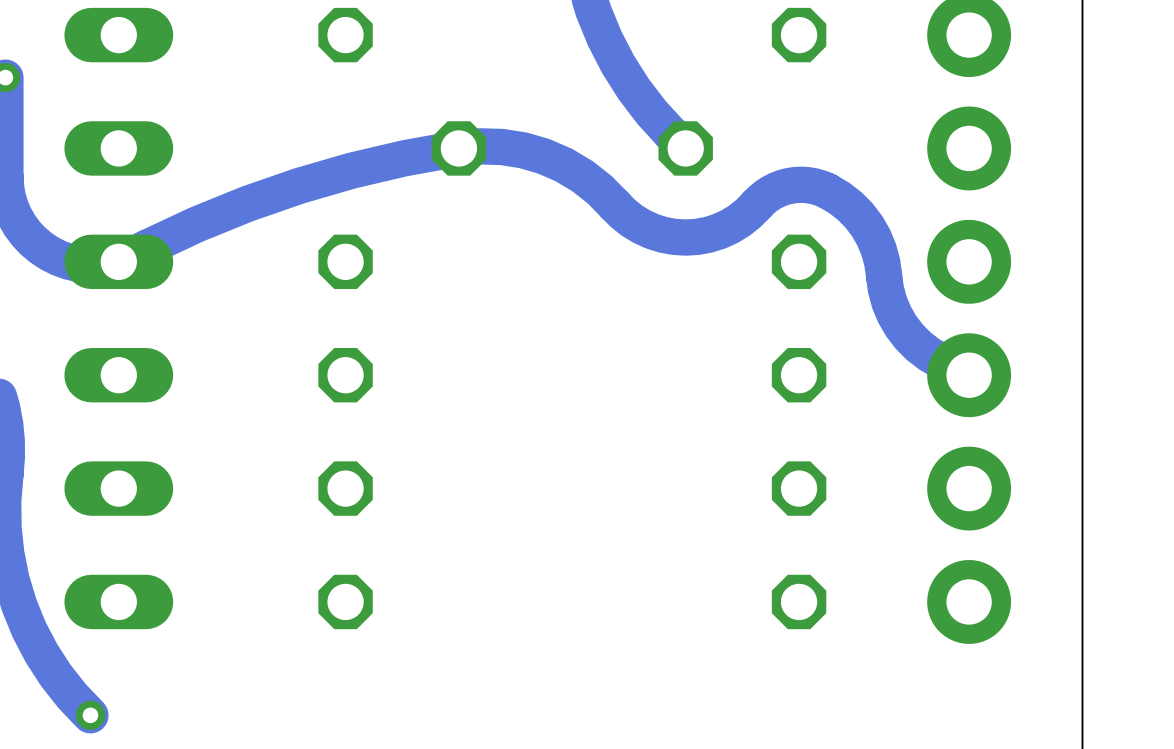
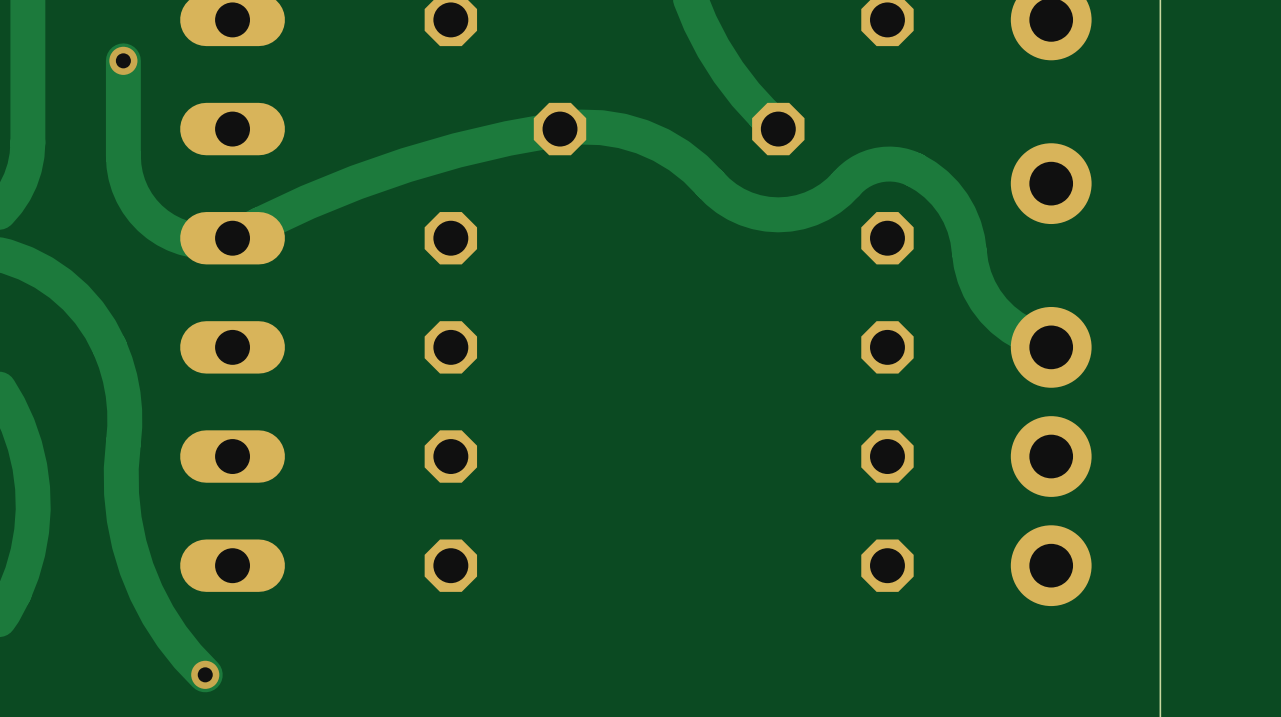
part: (969, 148) -> none
part: none -> (1051, 183)
part: (969, 261) -> none

